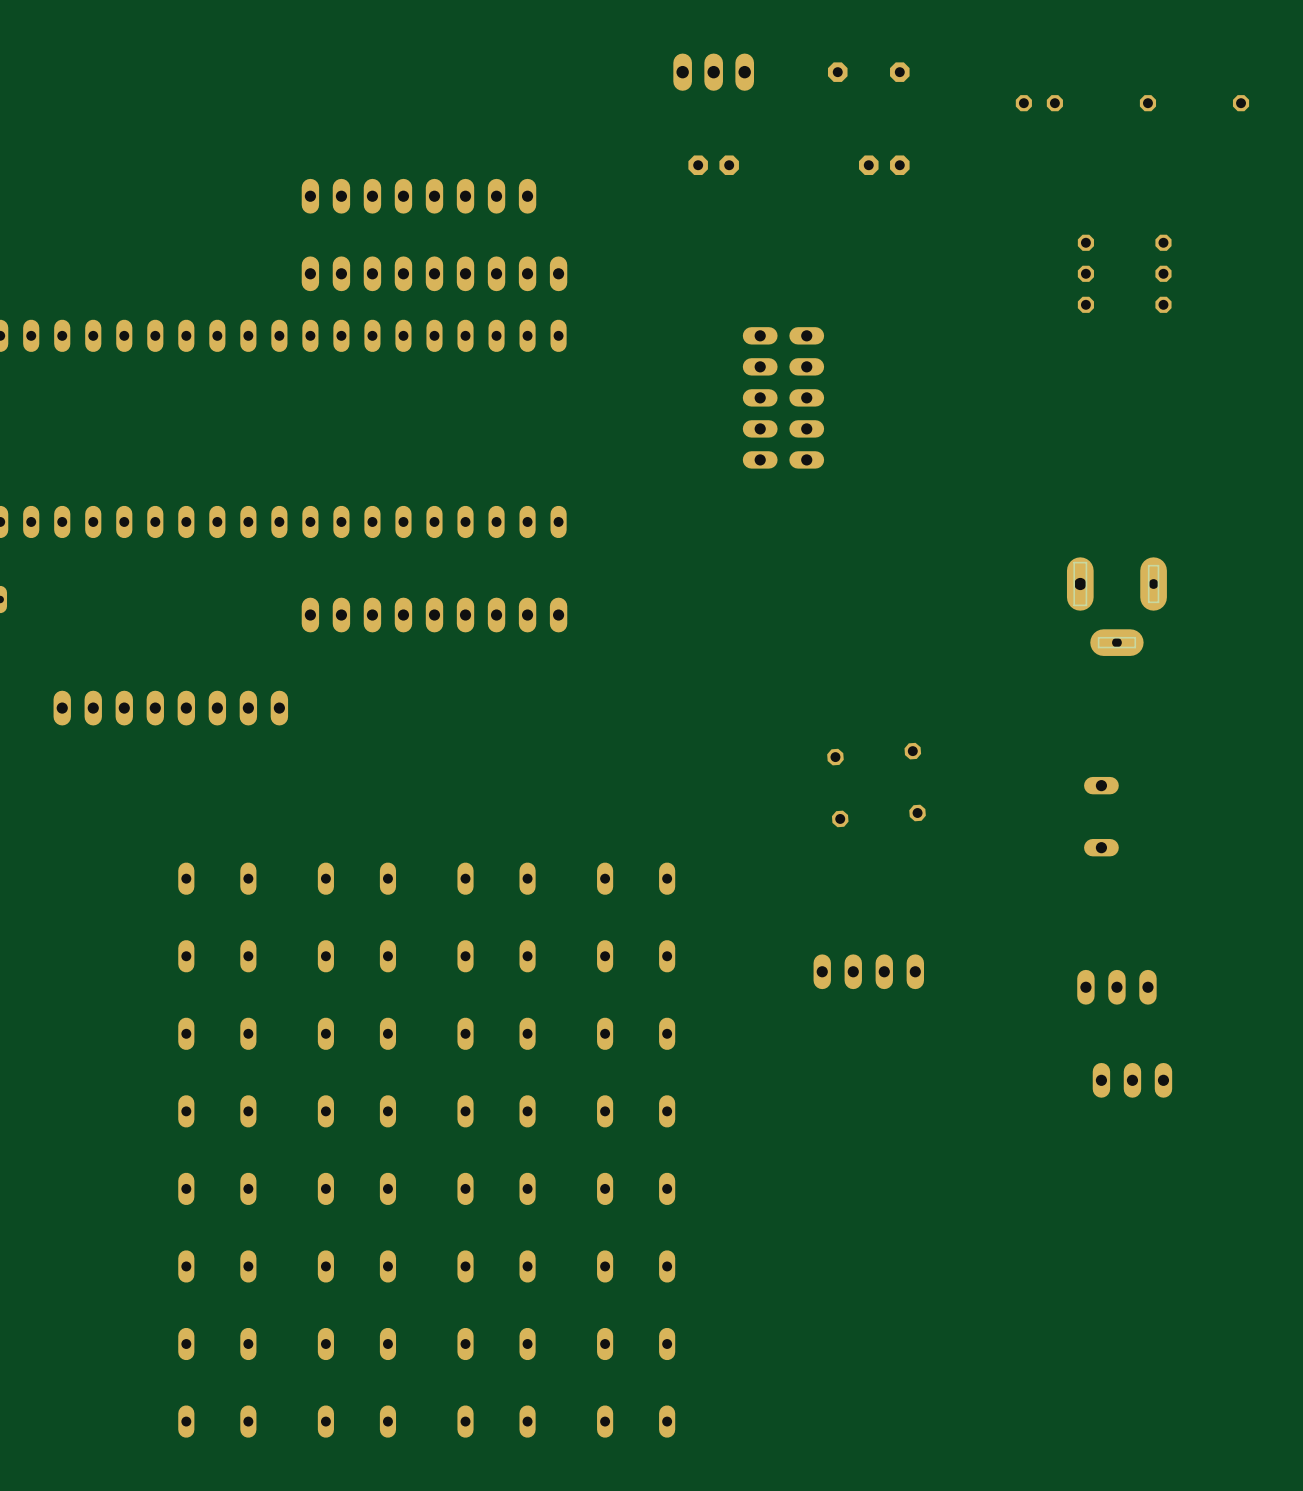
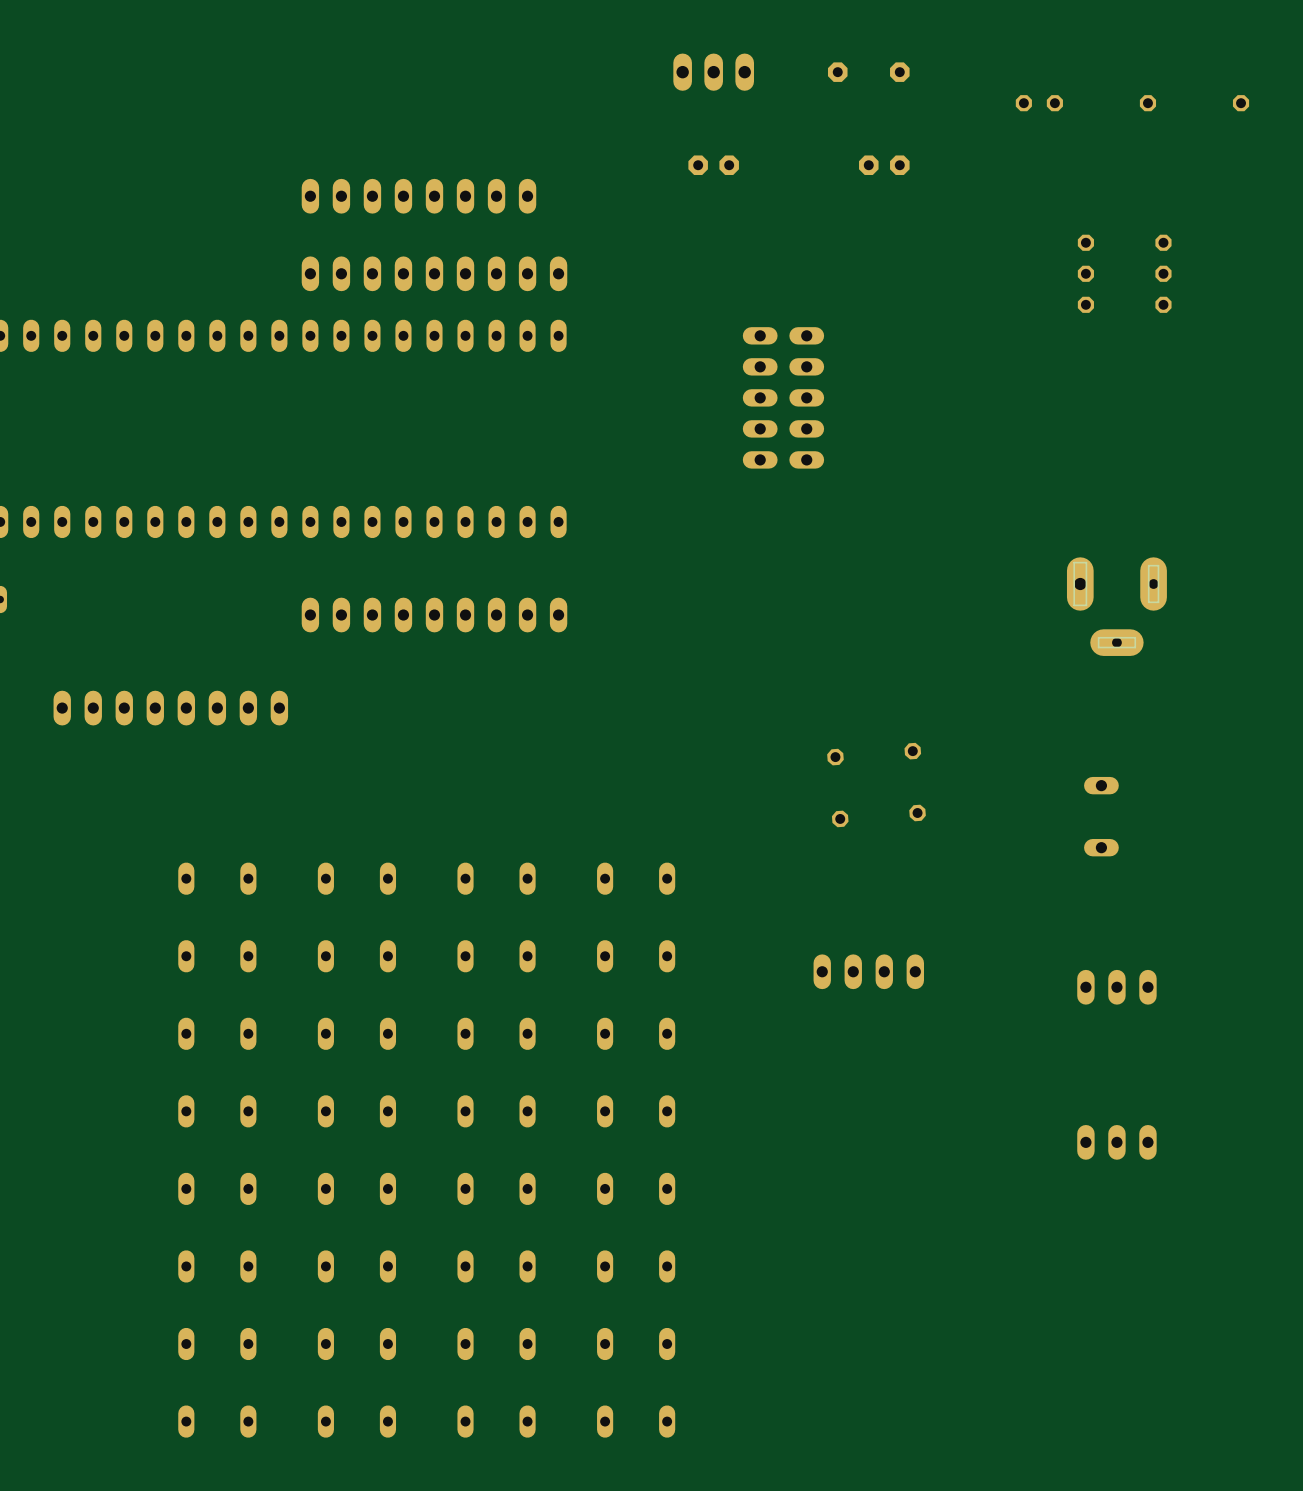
part position: (1132, 1080) -> (1116, 1142)

